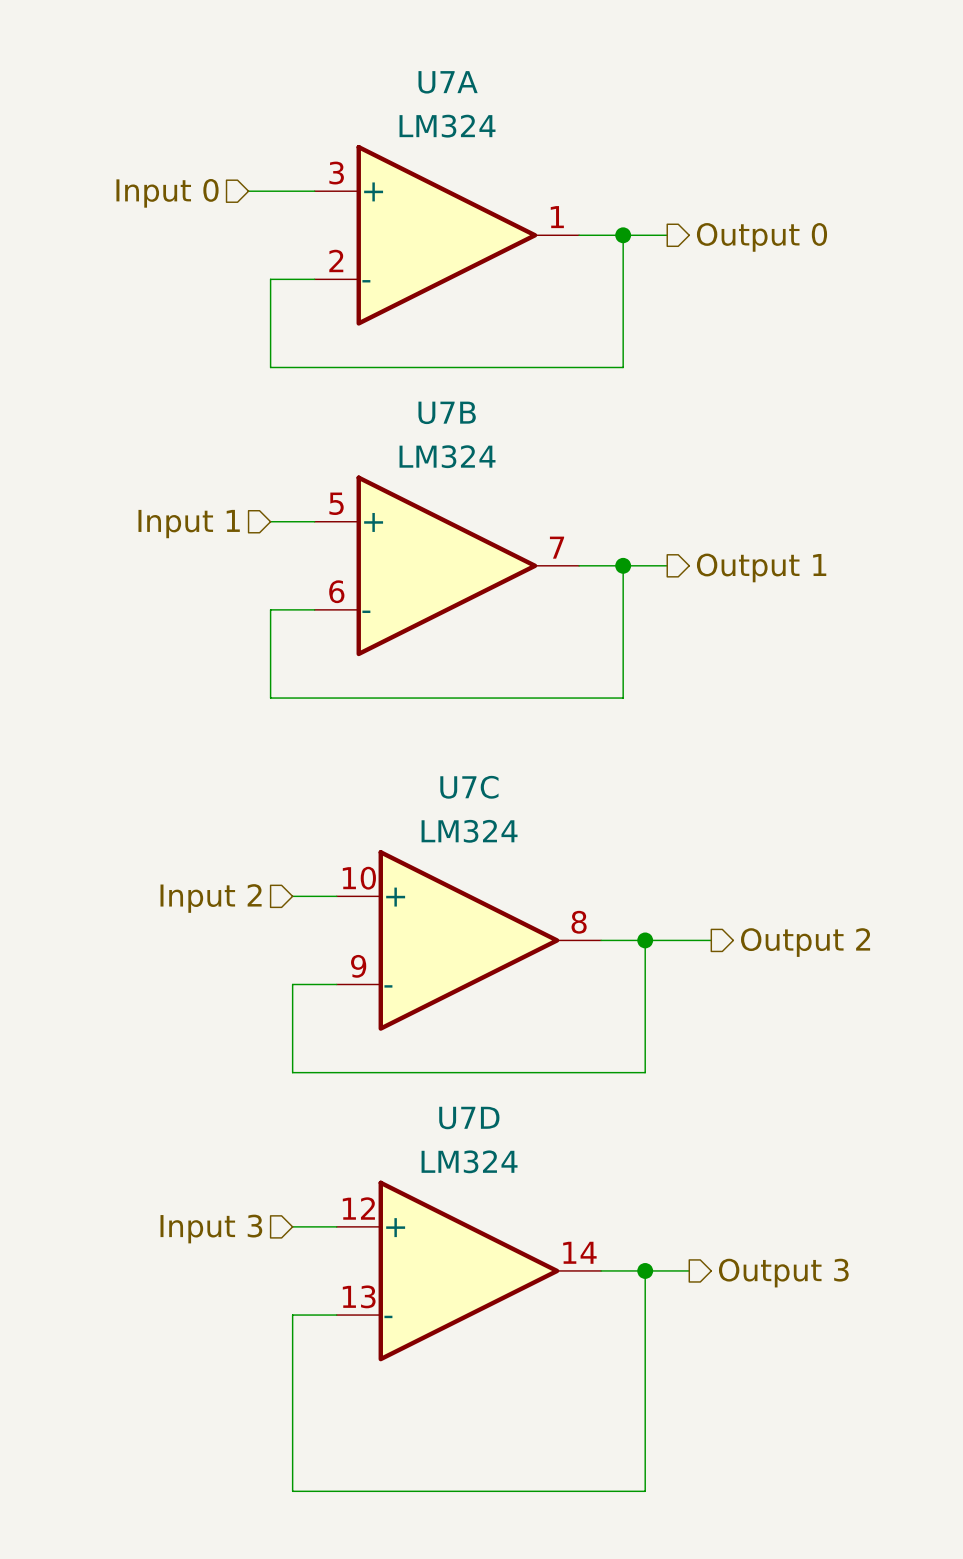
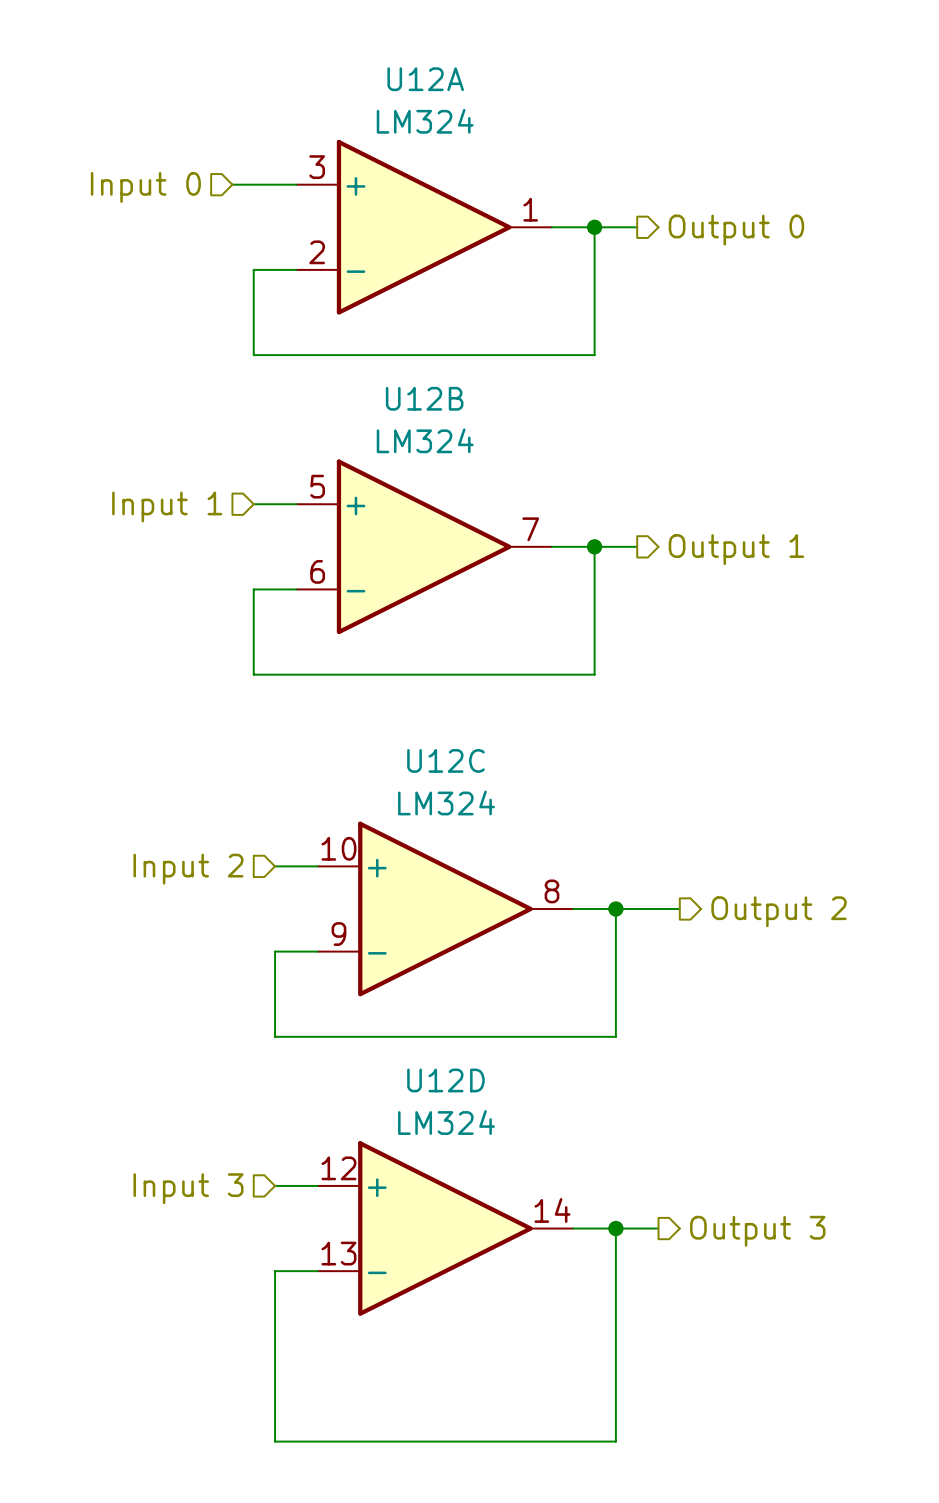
U7A name: U7A (448, 82) -> U12A (425, 79)
U7B name: U7B (447, 412) -> U12B (424, 398)
U7C name: U7C (469, 787) -> U12C (445, 760)
U7D name: U7D (469, 1118) -> U12D (445, 1080)

